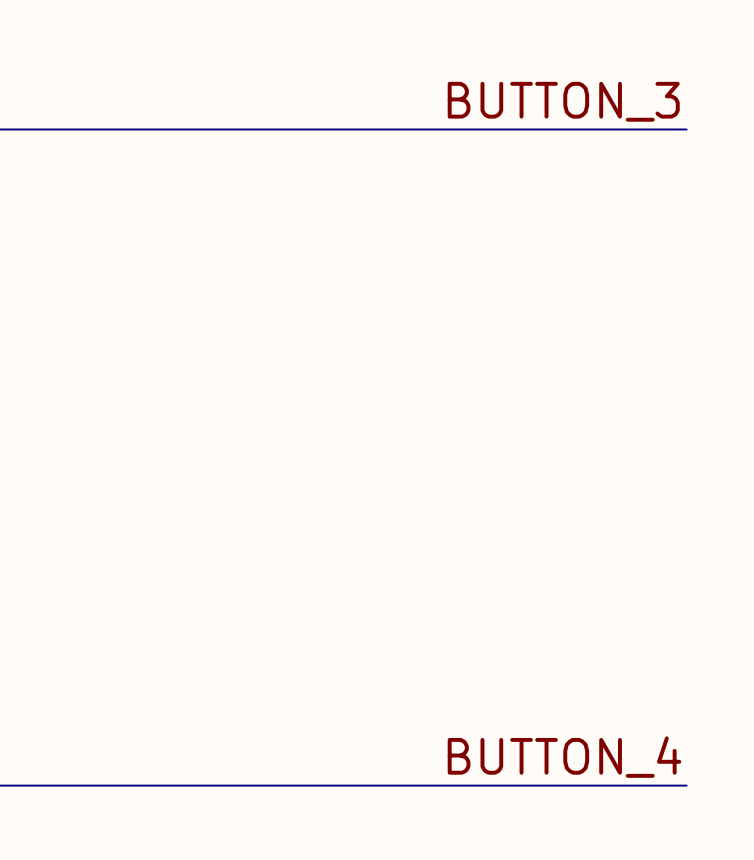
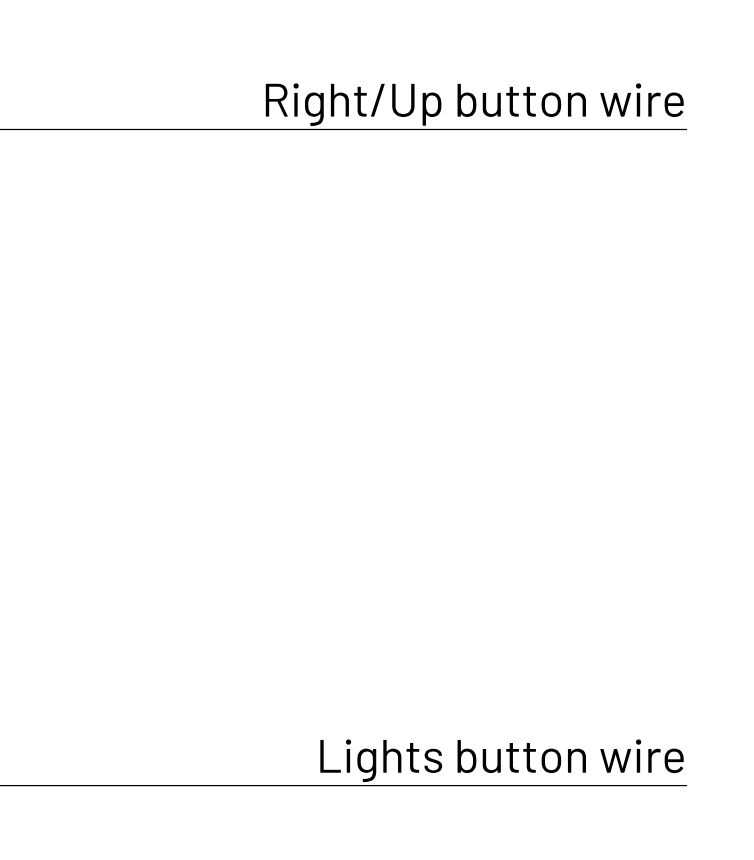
label: BUTTON_3 (563, 101) -> Right/Up button wire (474, 104)
label: BUTTON_4 (564, 757) -> Lights button wire (502, 760)

